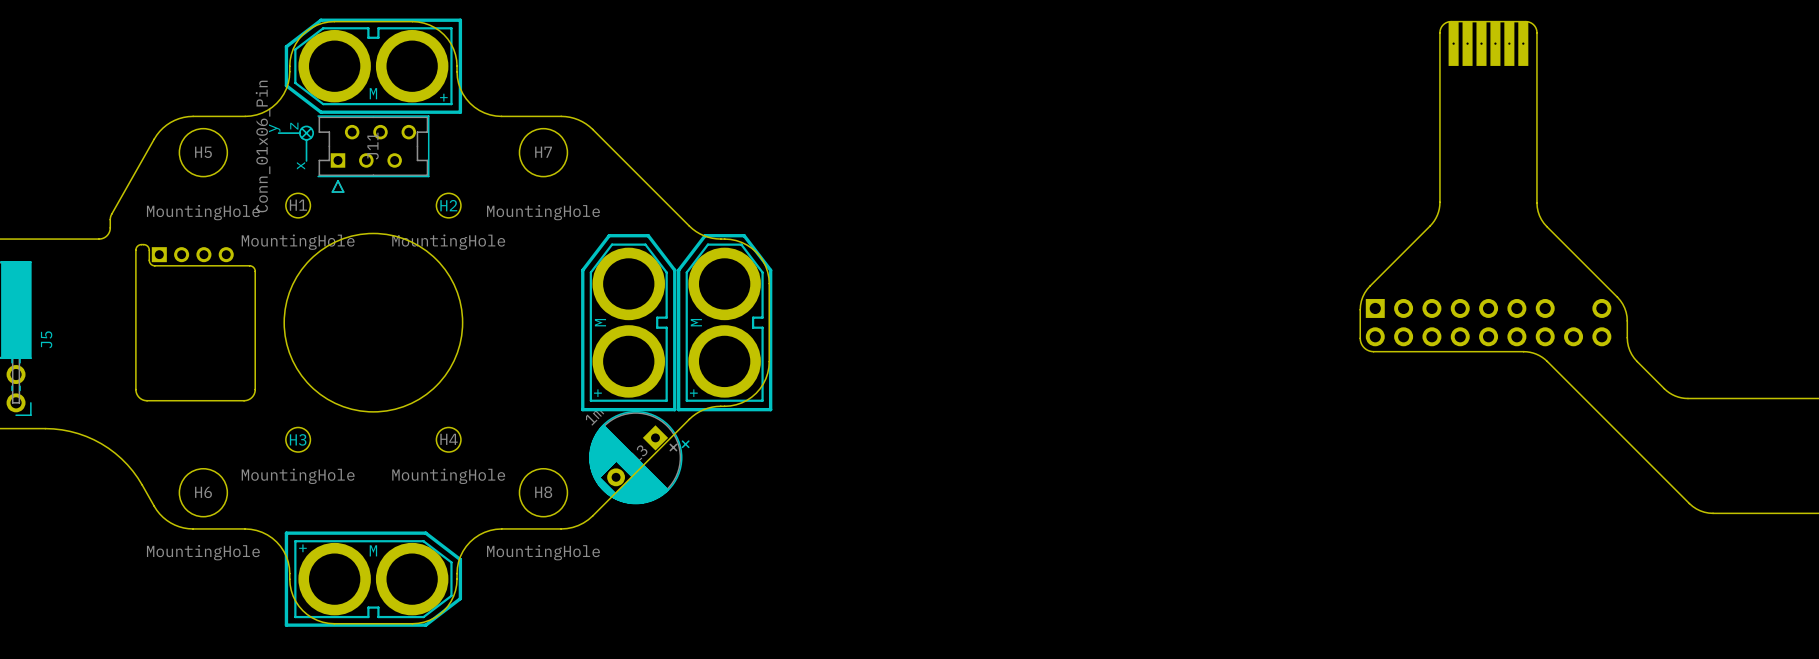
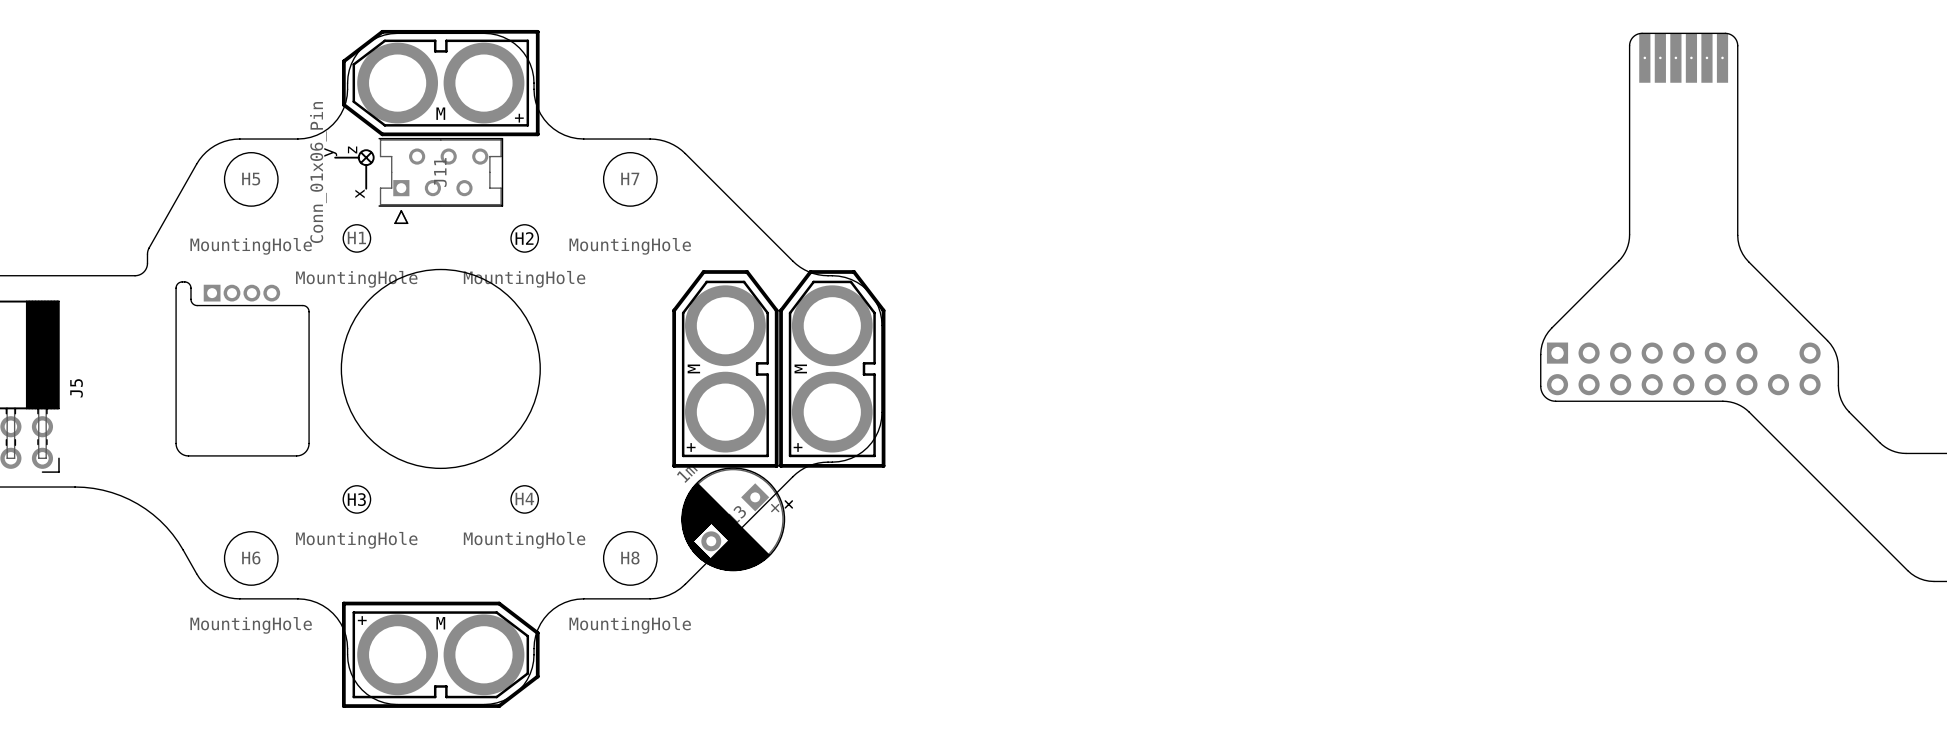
part footprint: [151, 247, 234, 263] -> [203, 284, 281, 302]

